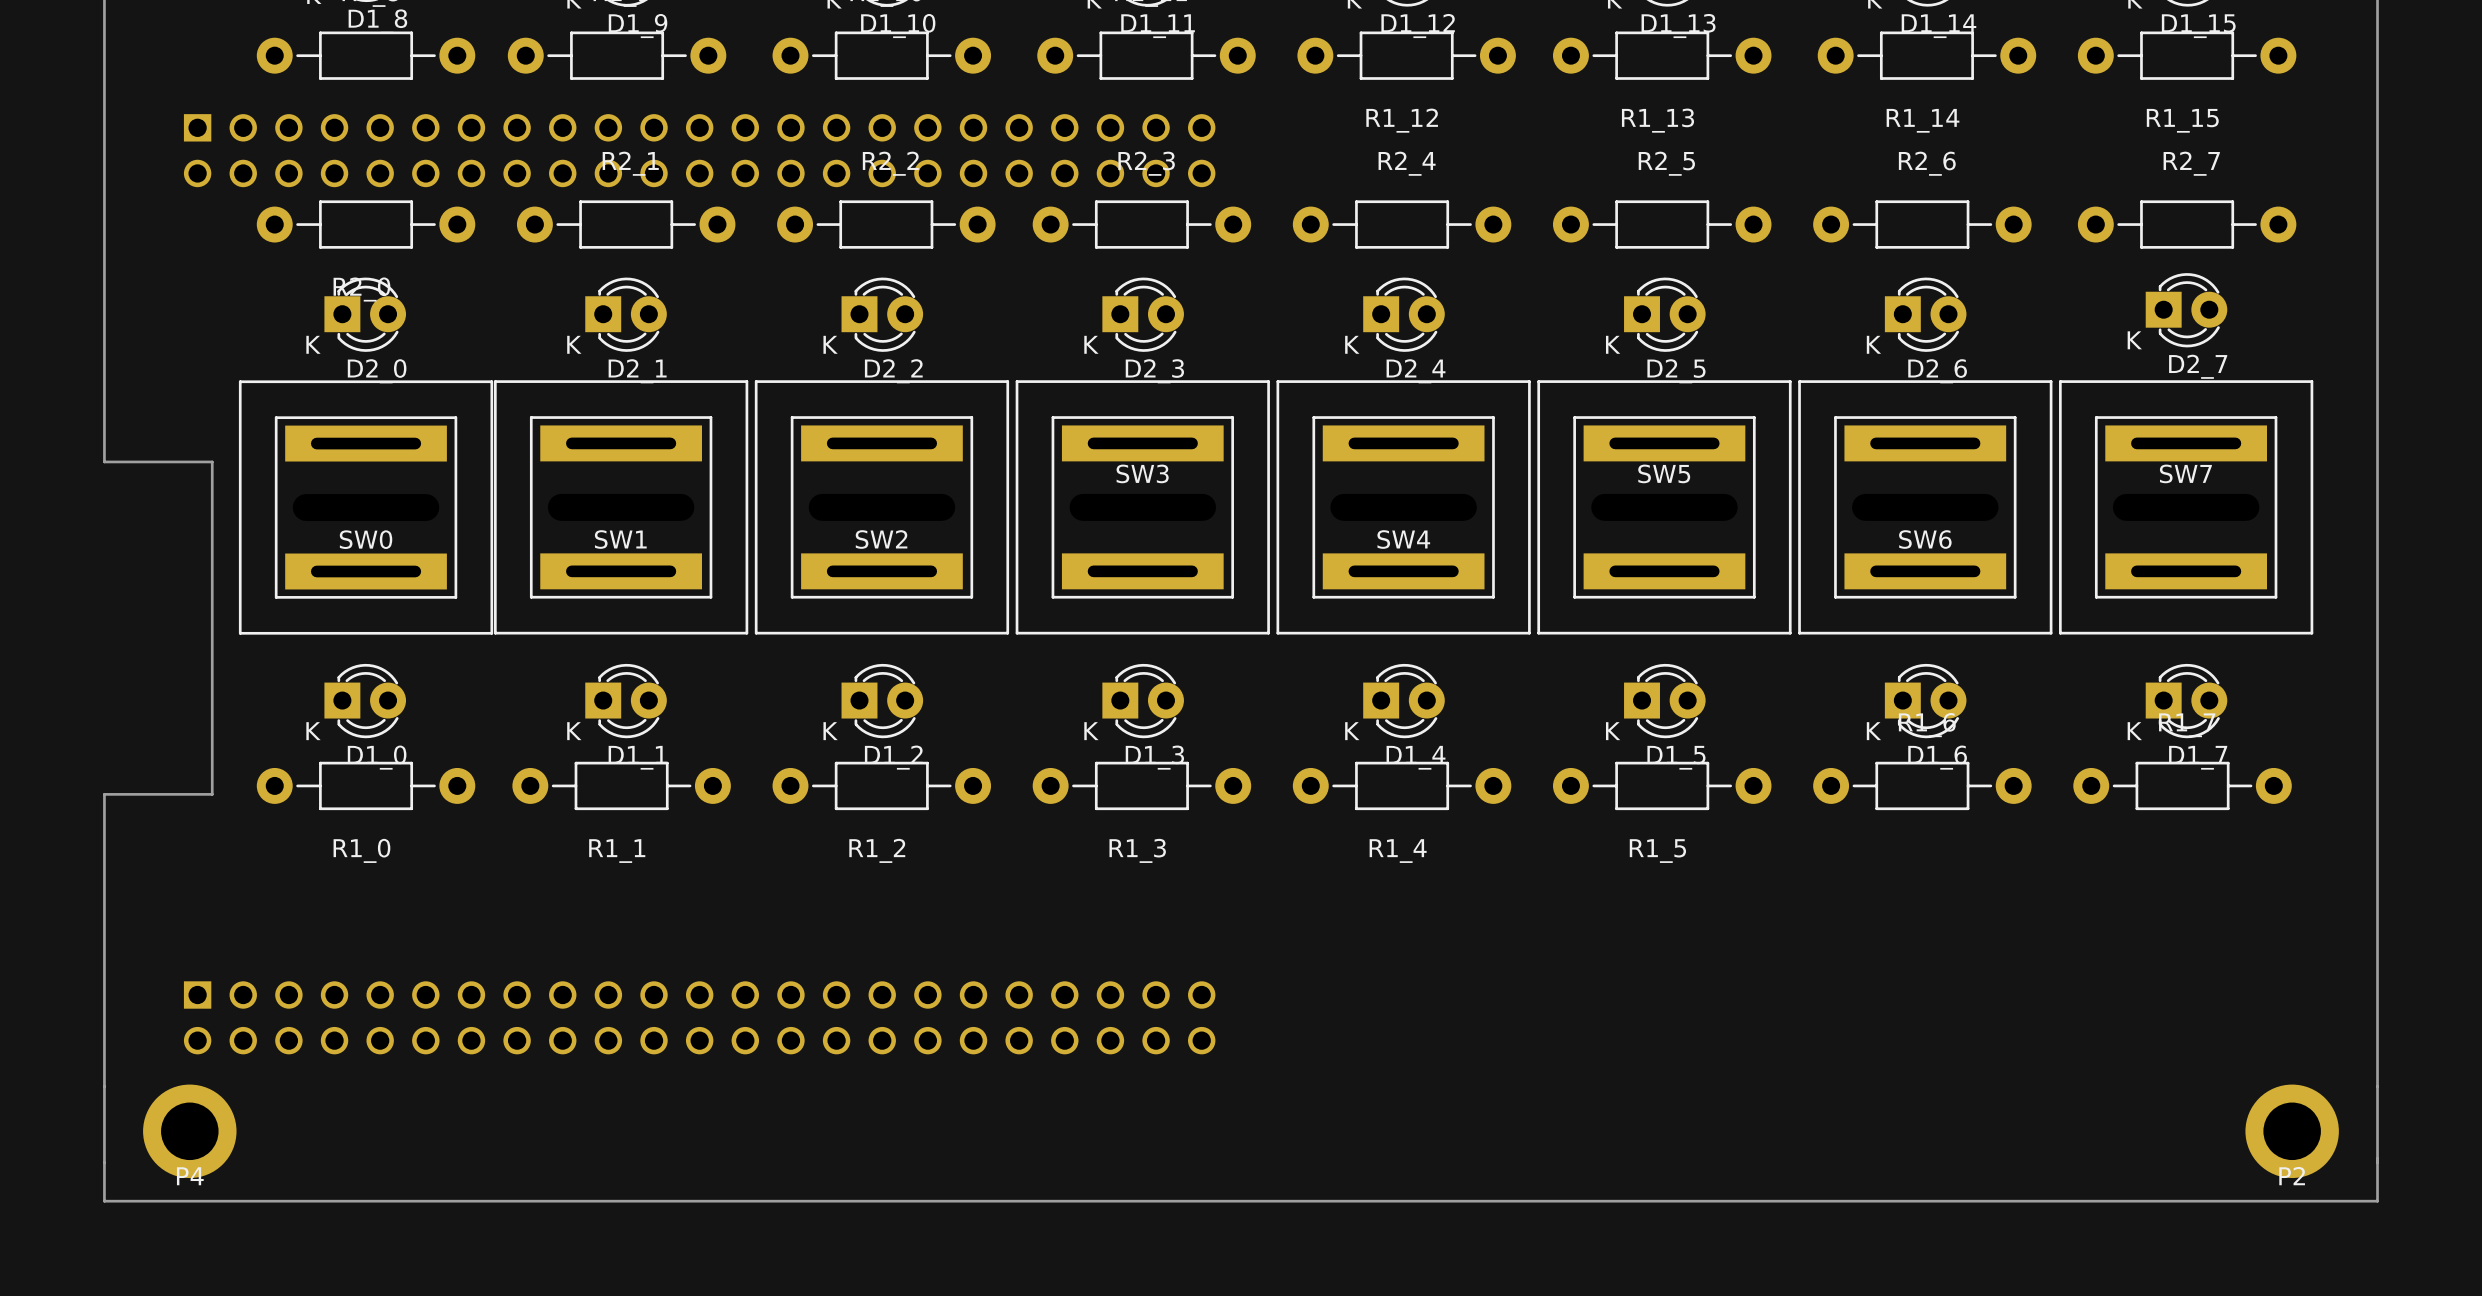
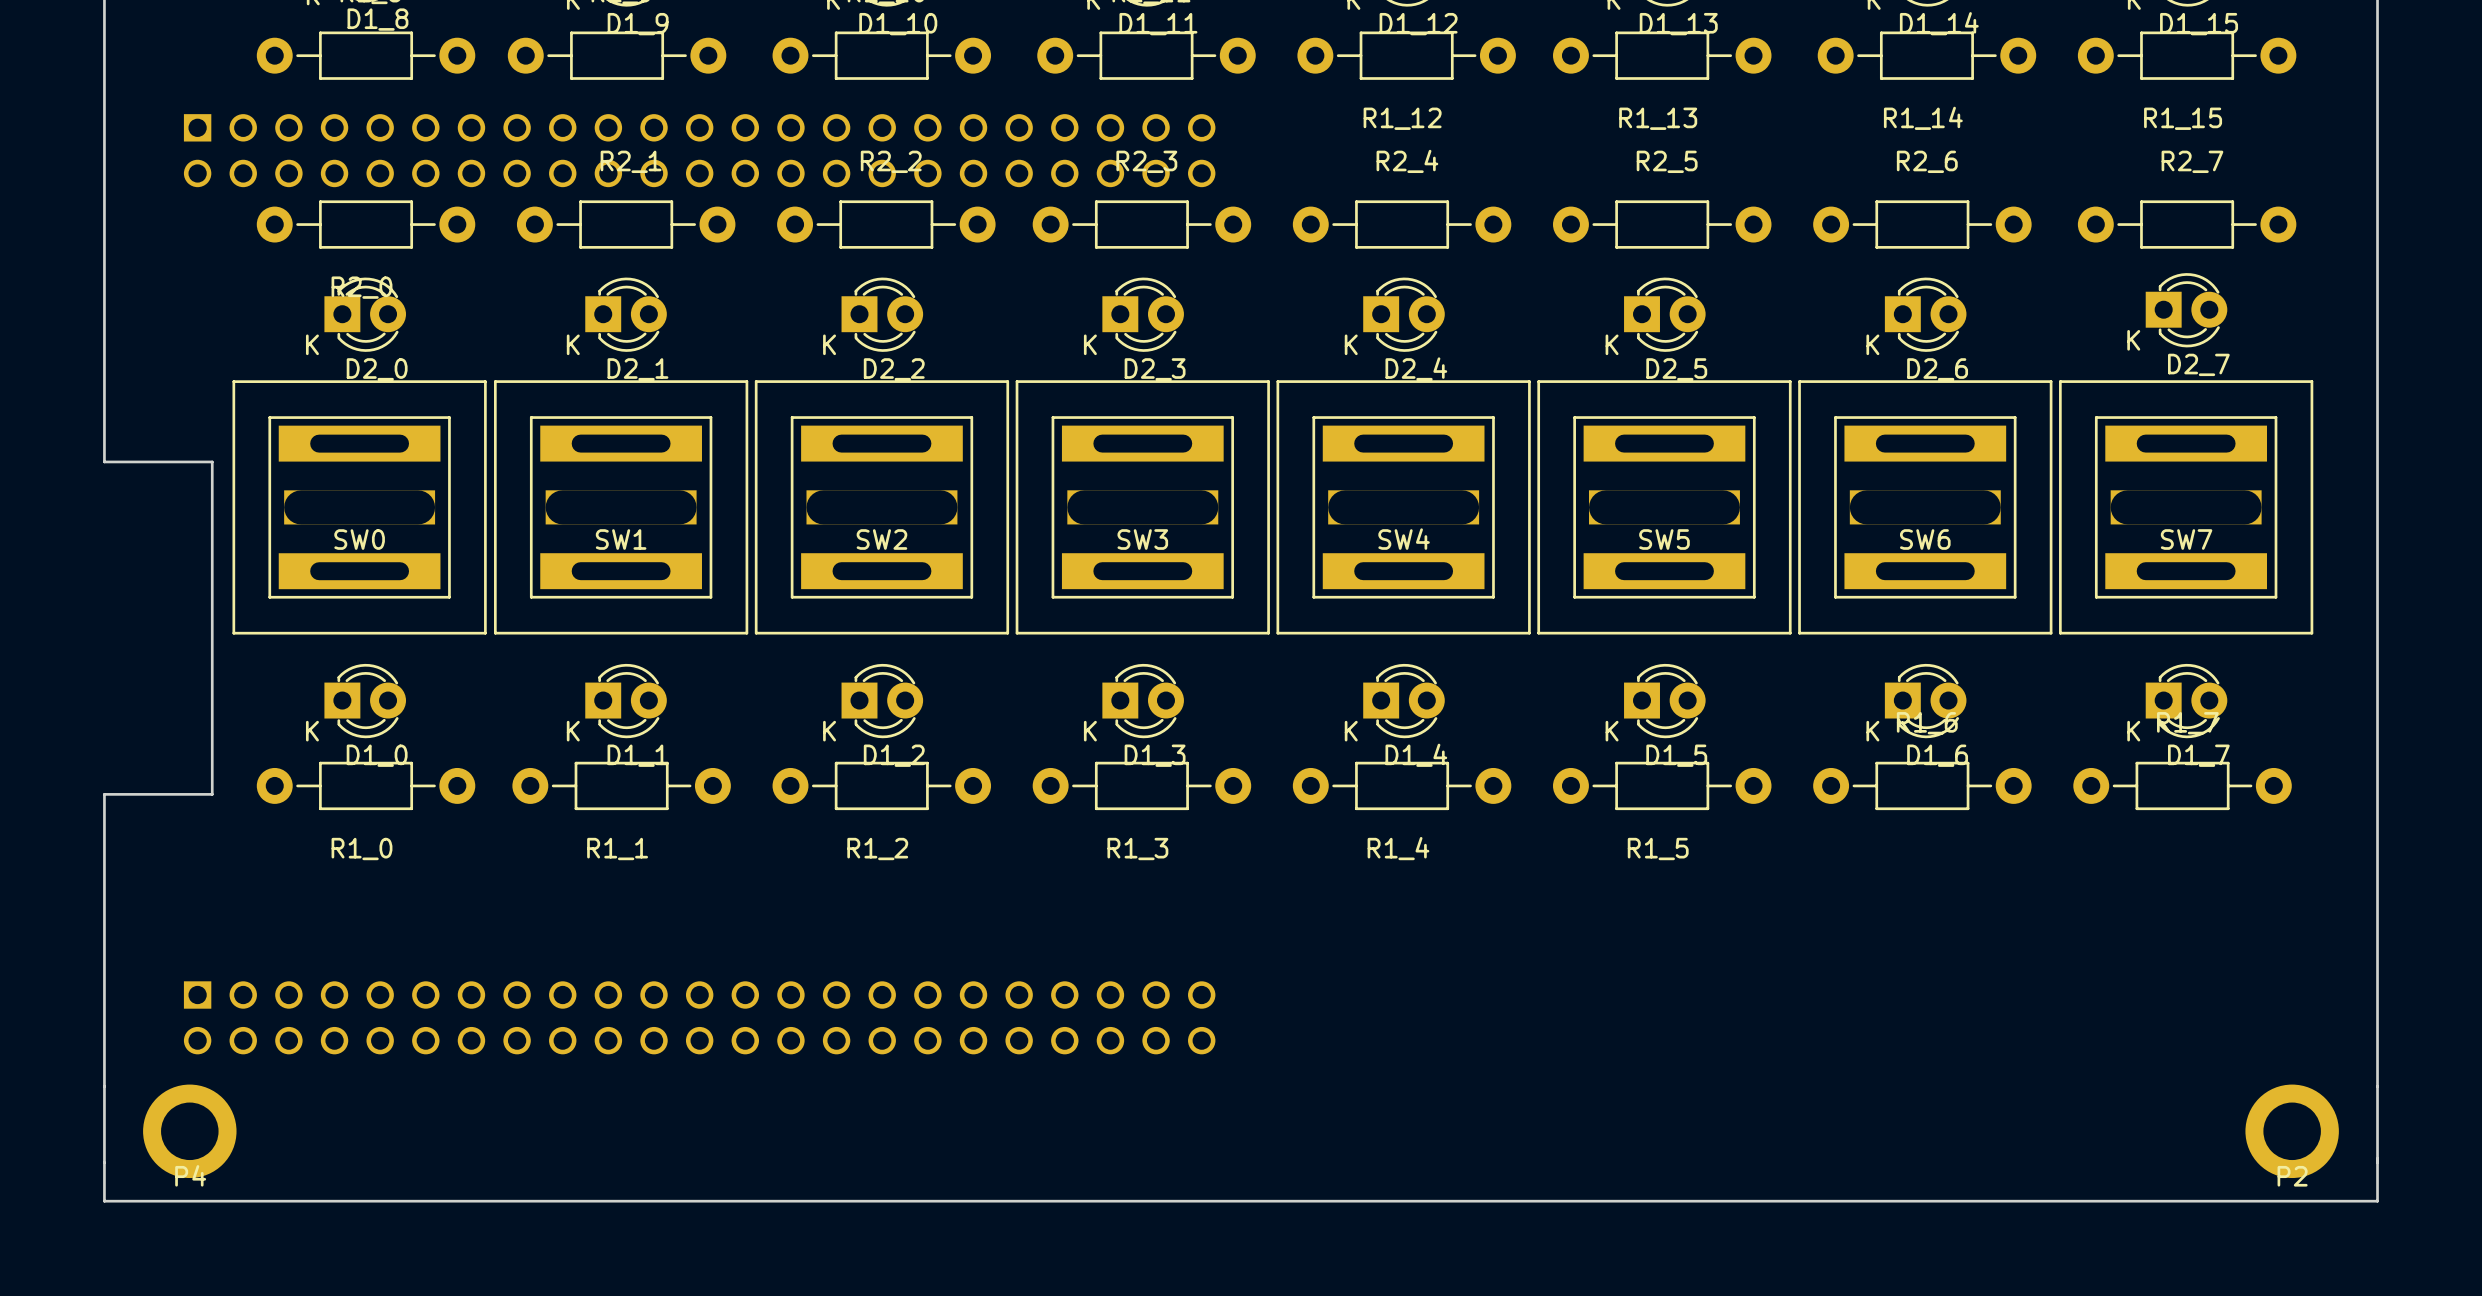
SW0 footprint: [238, 380, 494, 635] -> [232, 380, 487, 635]
SW1 footprint: [493, 380, 749, 635] -> [493, 380, 749, 635]
SW2 footprint: [754, 380, 1010, 635] -> [754, 380, 1010, 635]
SW3 footprint: [1015, 380, 1270, 635] -> [1015, 380, 1270, 635]
SW4 footprint: [1276, 380, 1531, 635] -> [1276, 380, 1531, 635]
SW5 footprint: [1537, 380, 1792, 635] -> [1537, 380, 1792, 635]
SW6 footprint: [1798, 380, 2053, 635] -> [1798, 380, 2053, 635]
SW7 footprint: [2059, 380, 2314, 635] -> [2059, 380, 2314, 635]
SW3 name position: SW3 (1142, 473) -> SW3 (1142, 539)
SW5 name position: SW5 (1664, 473) -> SW5 (1664, 539)
SW7 name position: SW7 (2185, 473) -> SW7 (2186, 539)

